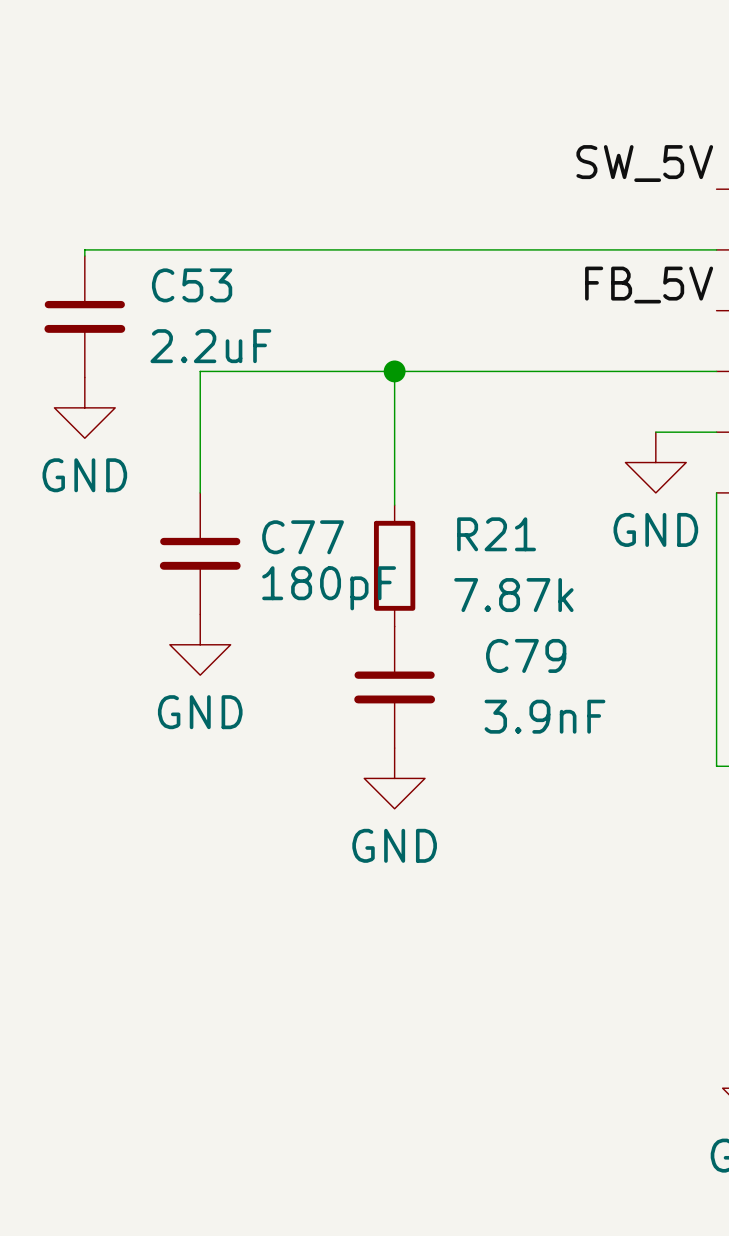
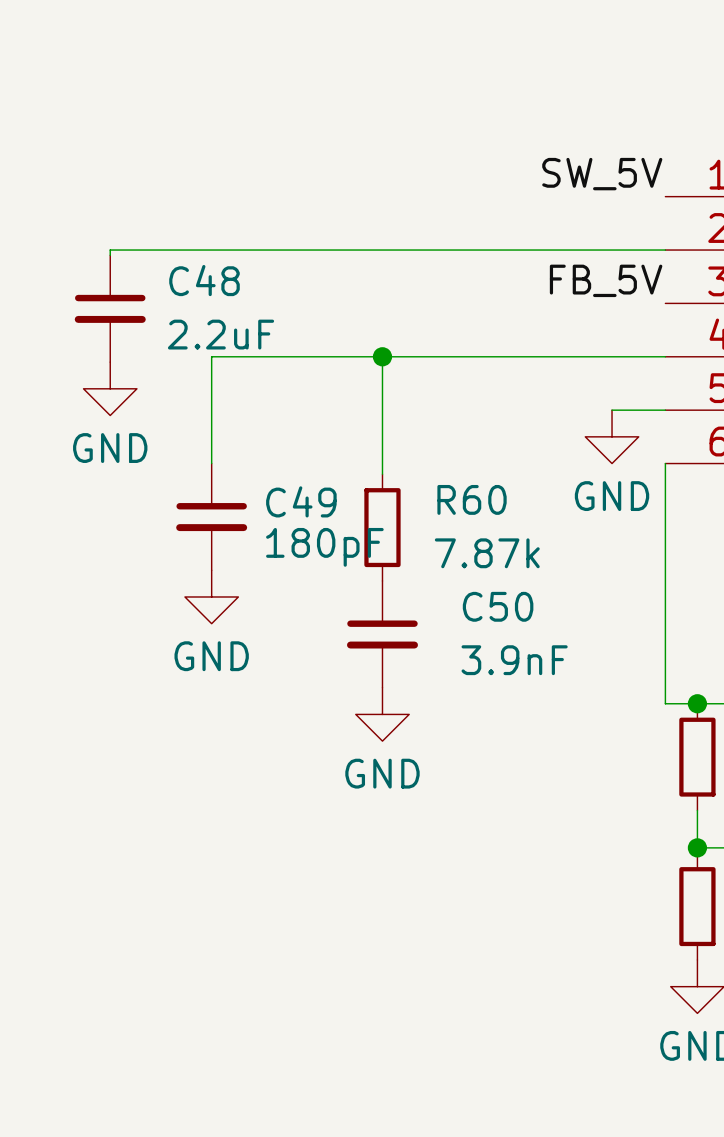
C53 name: C53 (192, 285) -> C48 (204, 280)
R21 name: R21 (496, 534) -> R60 (472, 499)
C77 name: C77 (303, 537) -> C49 (301, 501)
C79 name: C79 (526, 655) -> C50 (498, 606)

